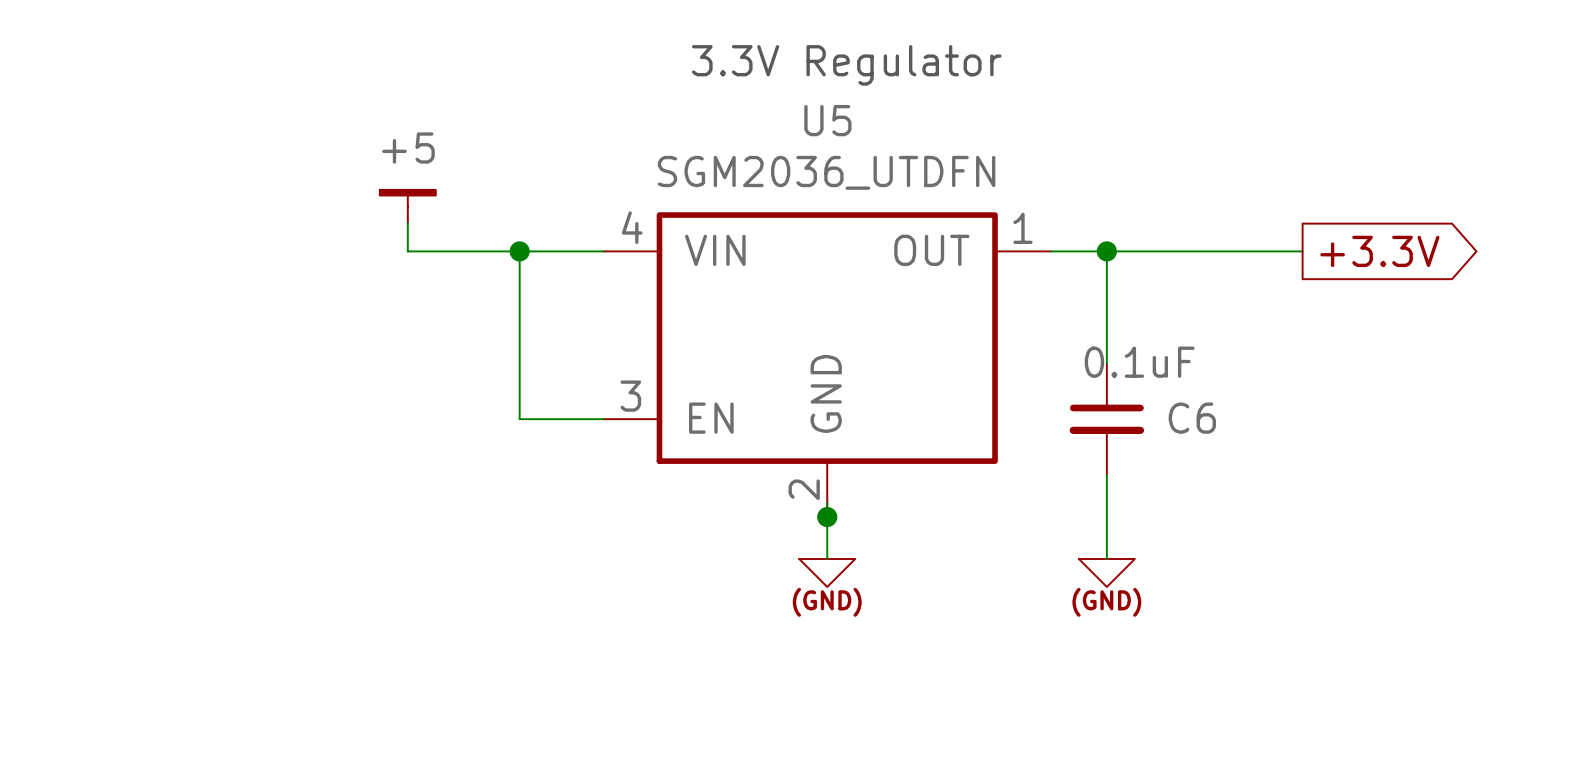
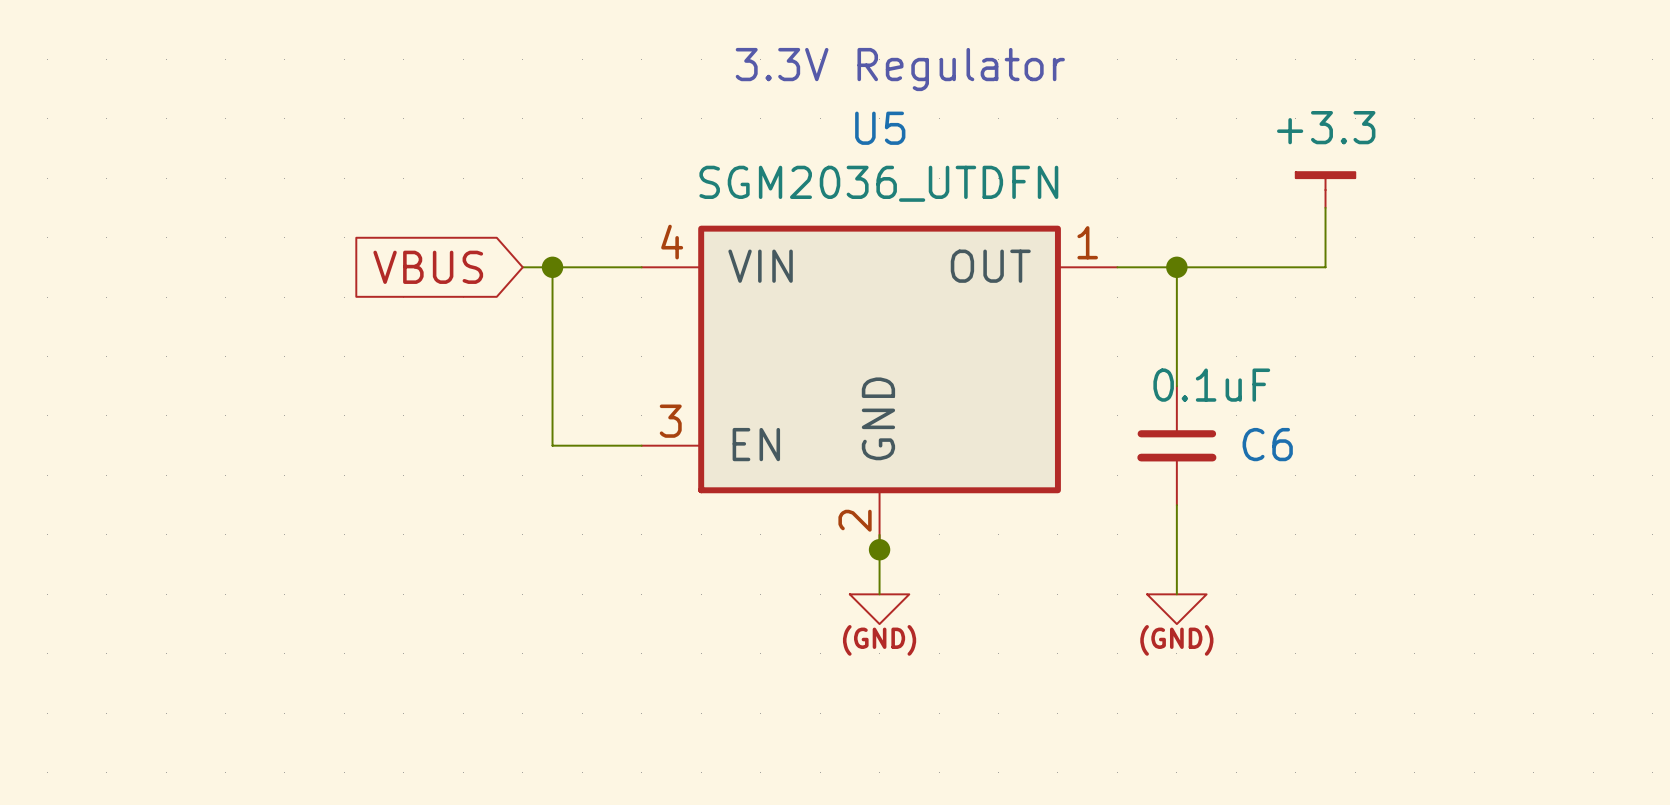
power symbol: none -> +3.3 (1325, 190)
power symbol: +5 (407, 206) -> none
wire: (407, 223) (407, 251) (491, 251) -> none
global label: none -> VBUS (428, 267)
wire: (1246, 251) (1302, 251) -> (1325, 267) (1325, 207)
global label: +3.3V (1379, 251) -> none

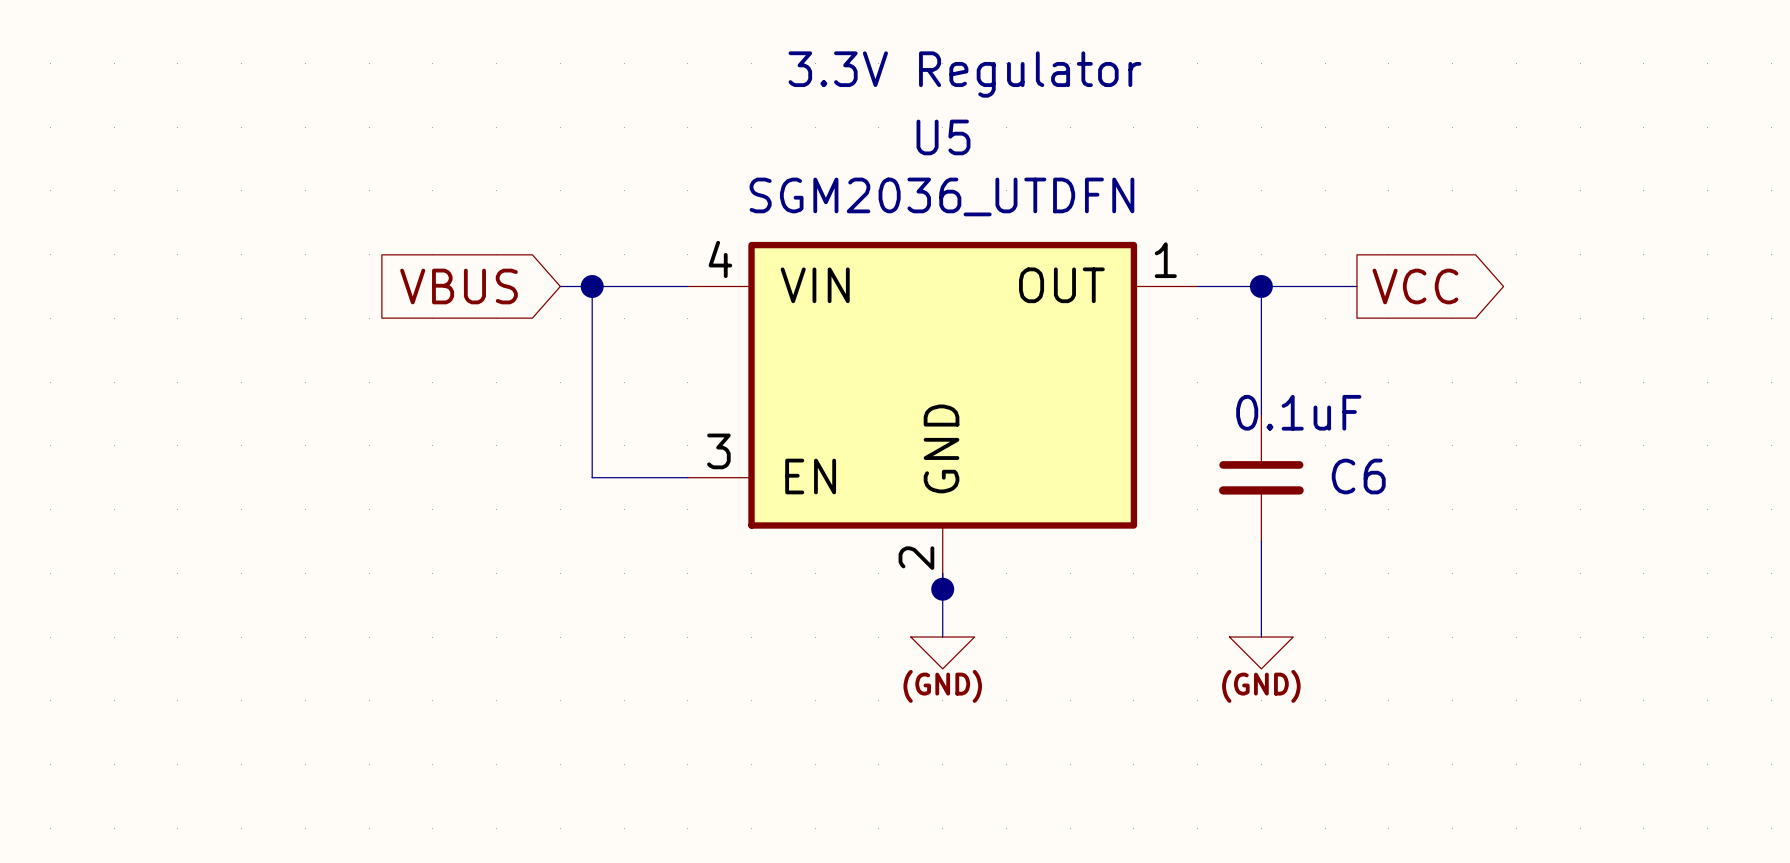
power symbol: +3.3 (1325, 190) -> none
wire: (1325, 207) (1325, 267) (1266, 267) -> none
global label: none -> VCC (1415, 286)

